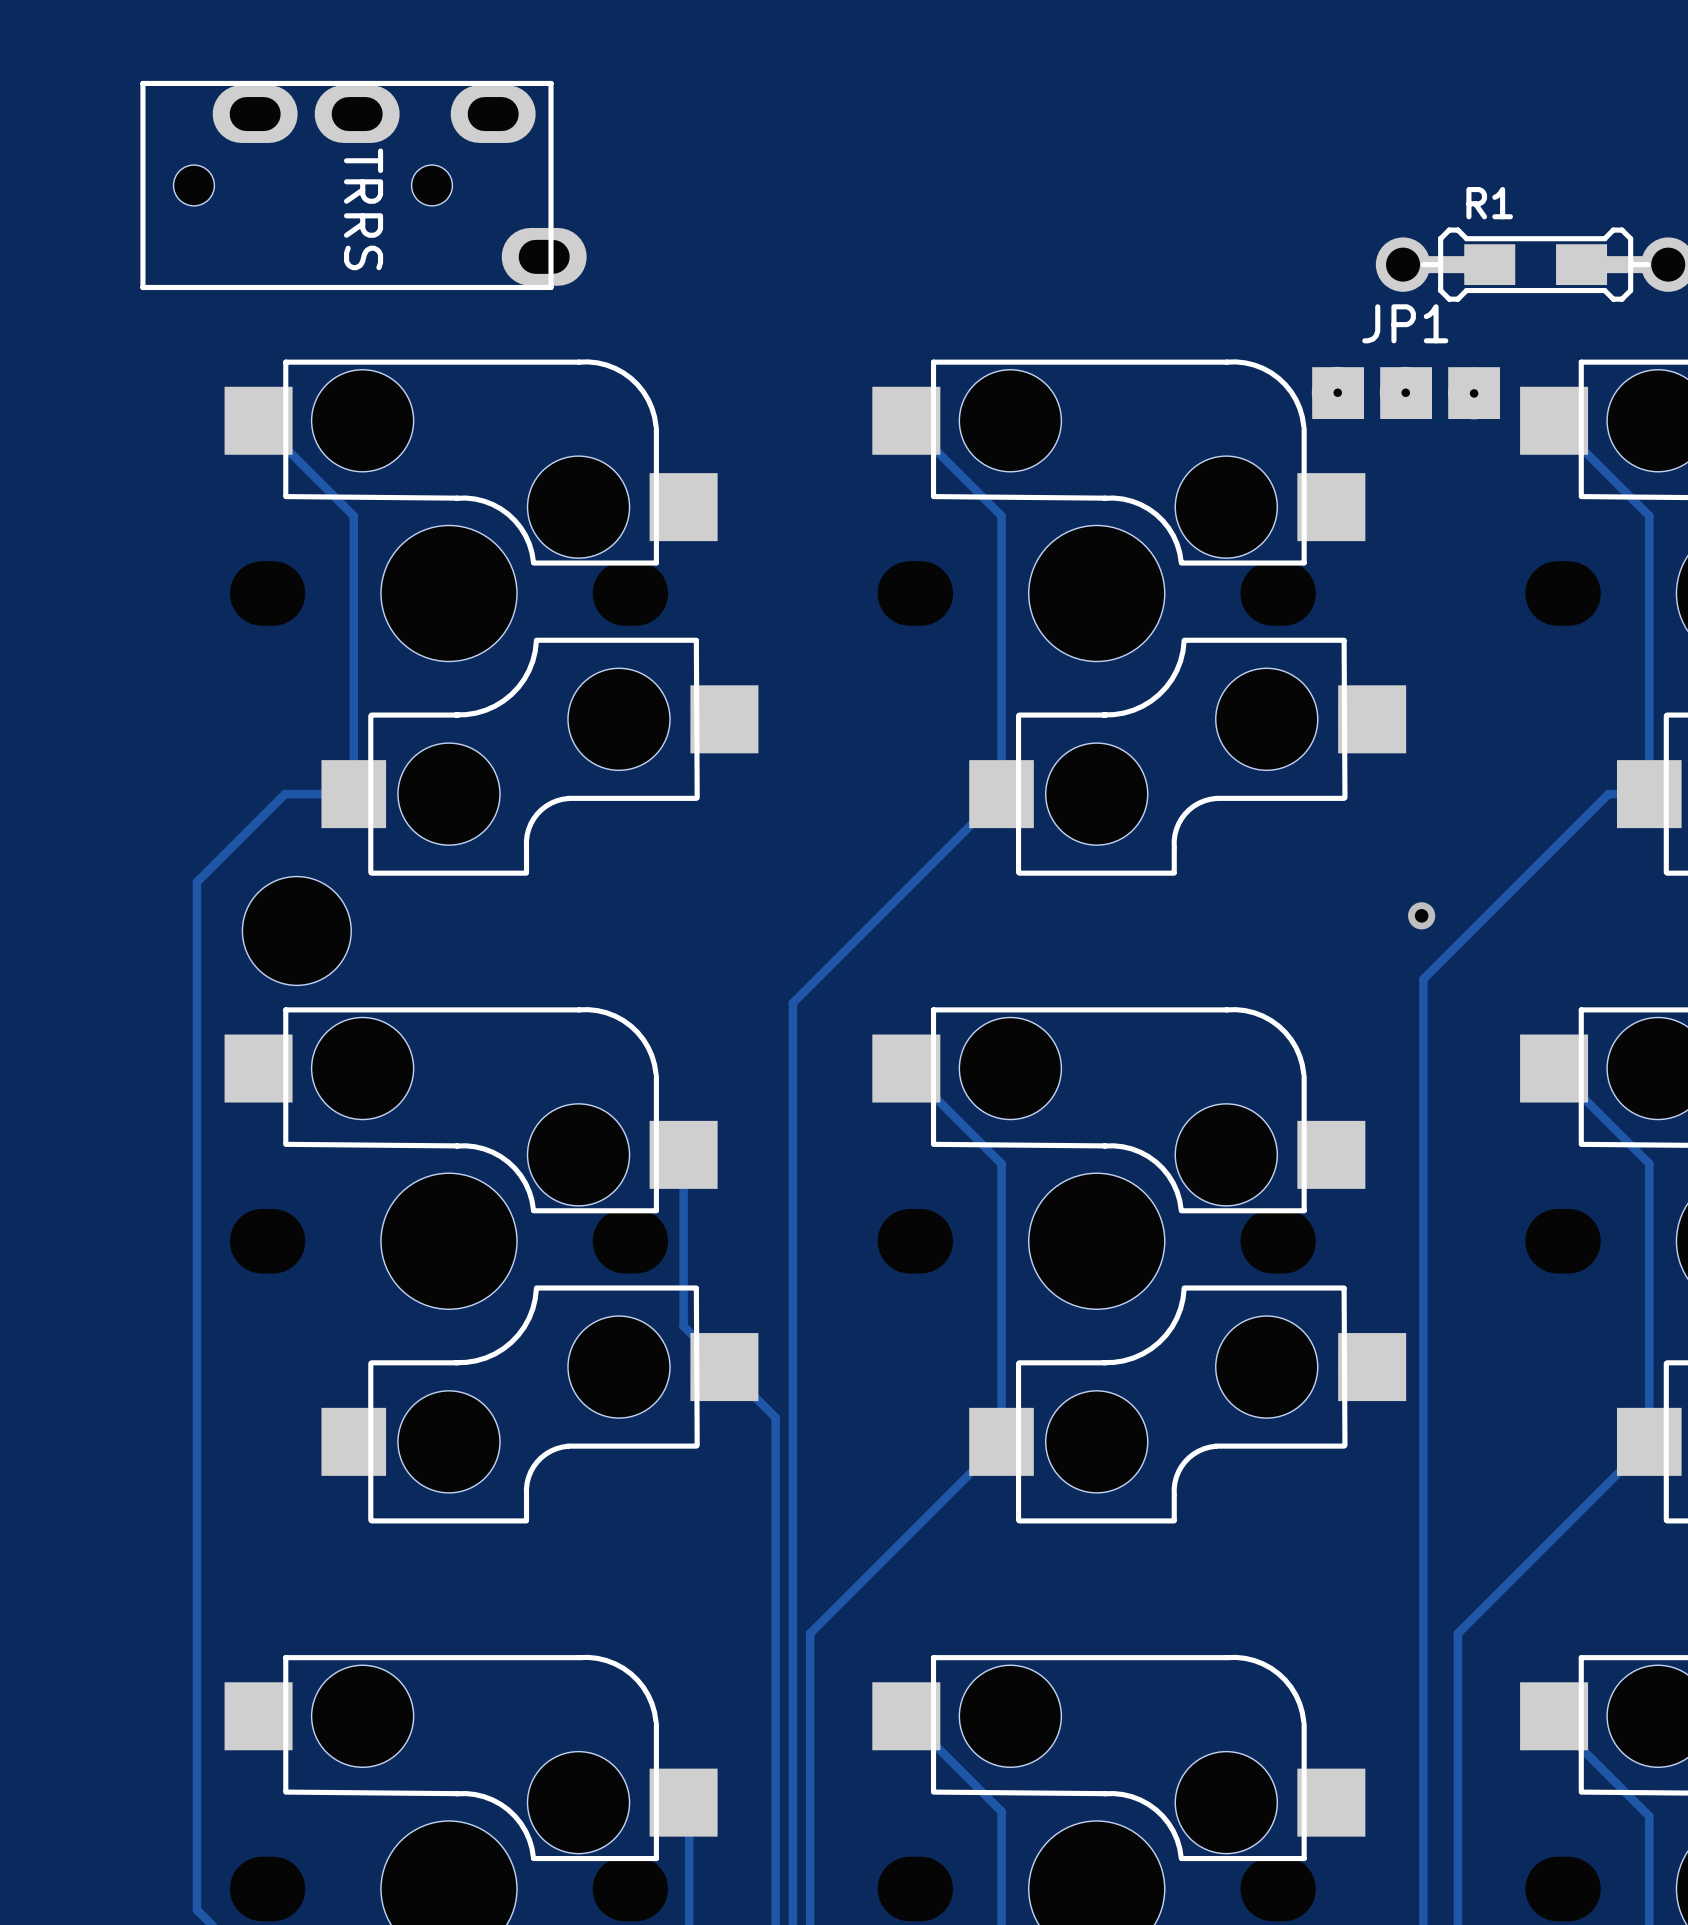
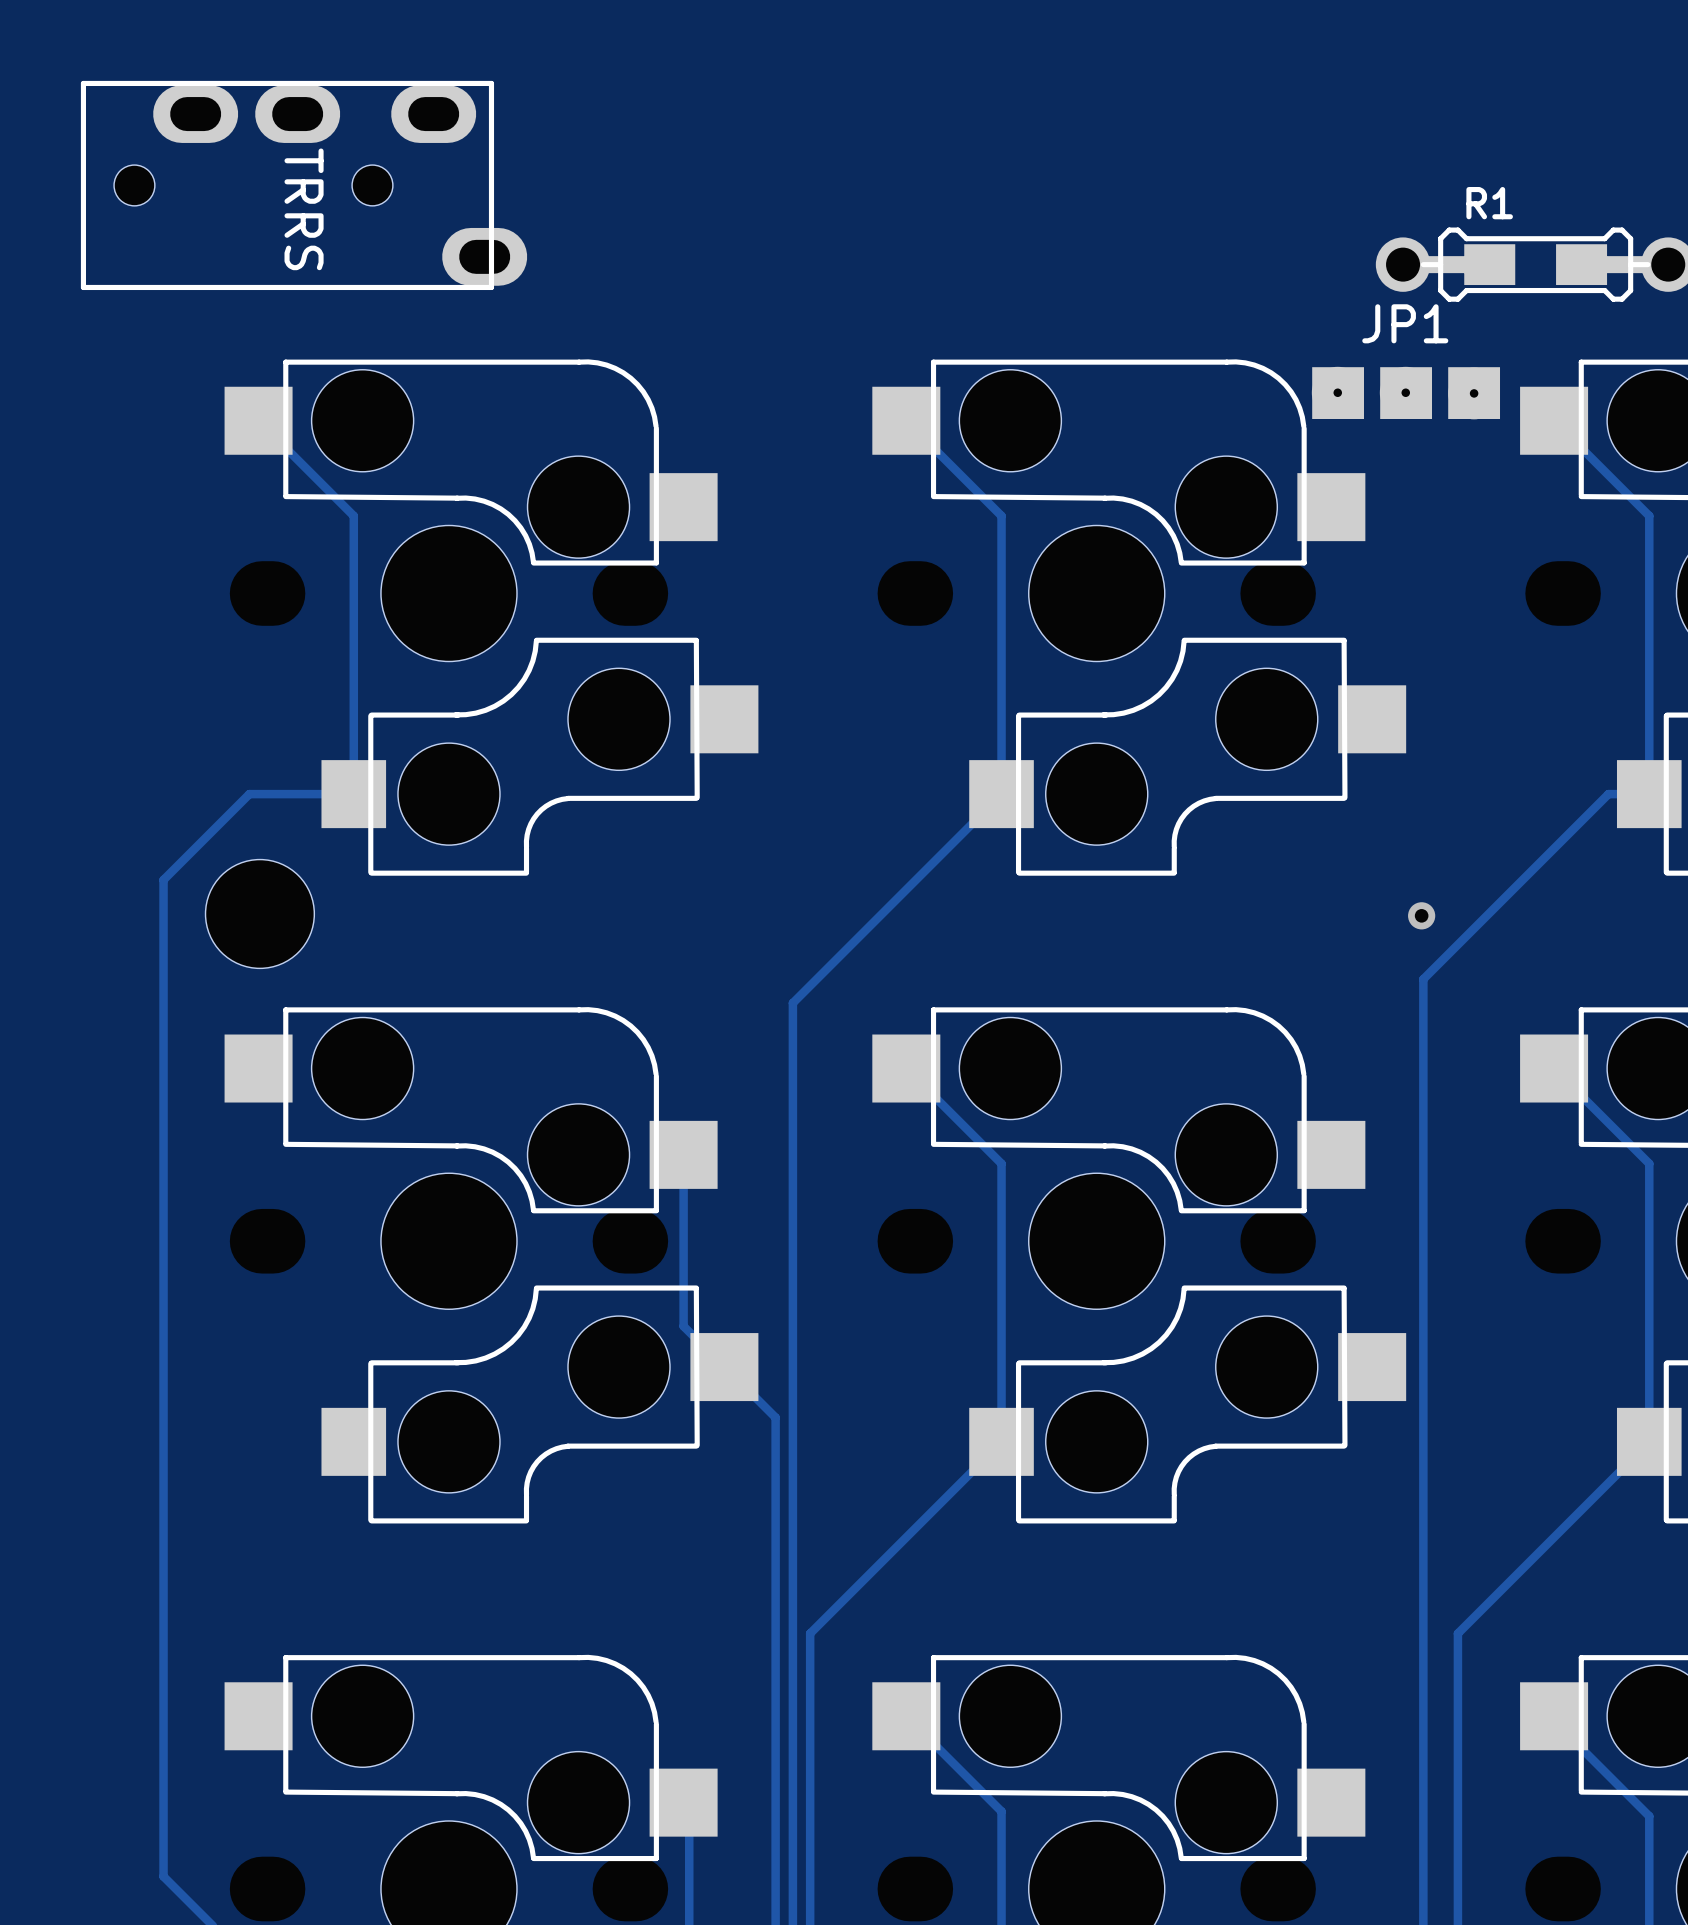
part position: (363, 185) -> (304, 185)
track: (353, 515) (353, 794) (284, 794) (196, 882) (196, 1909) -> (353, 515) (353, 794) (249, 794) (163, 879) (163, 1876) (196, 1909)
part position: (296, 930) -> (259, 913)

